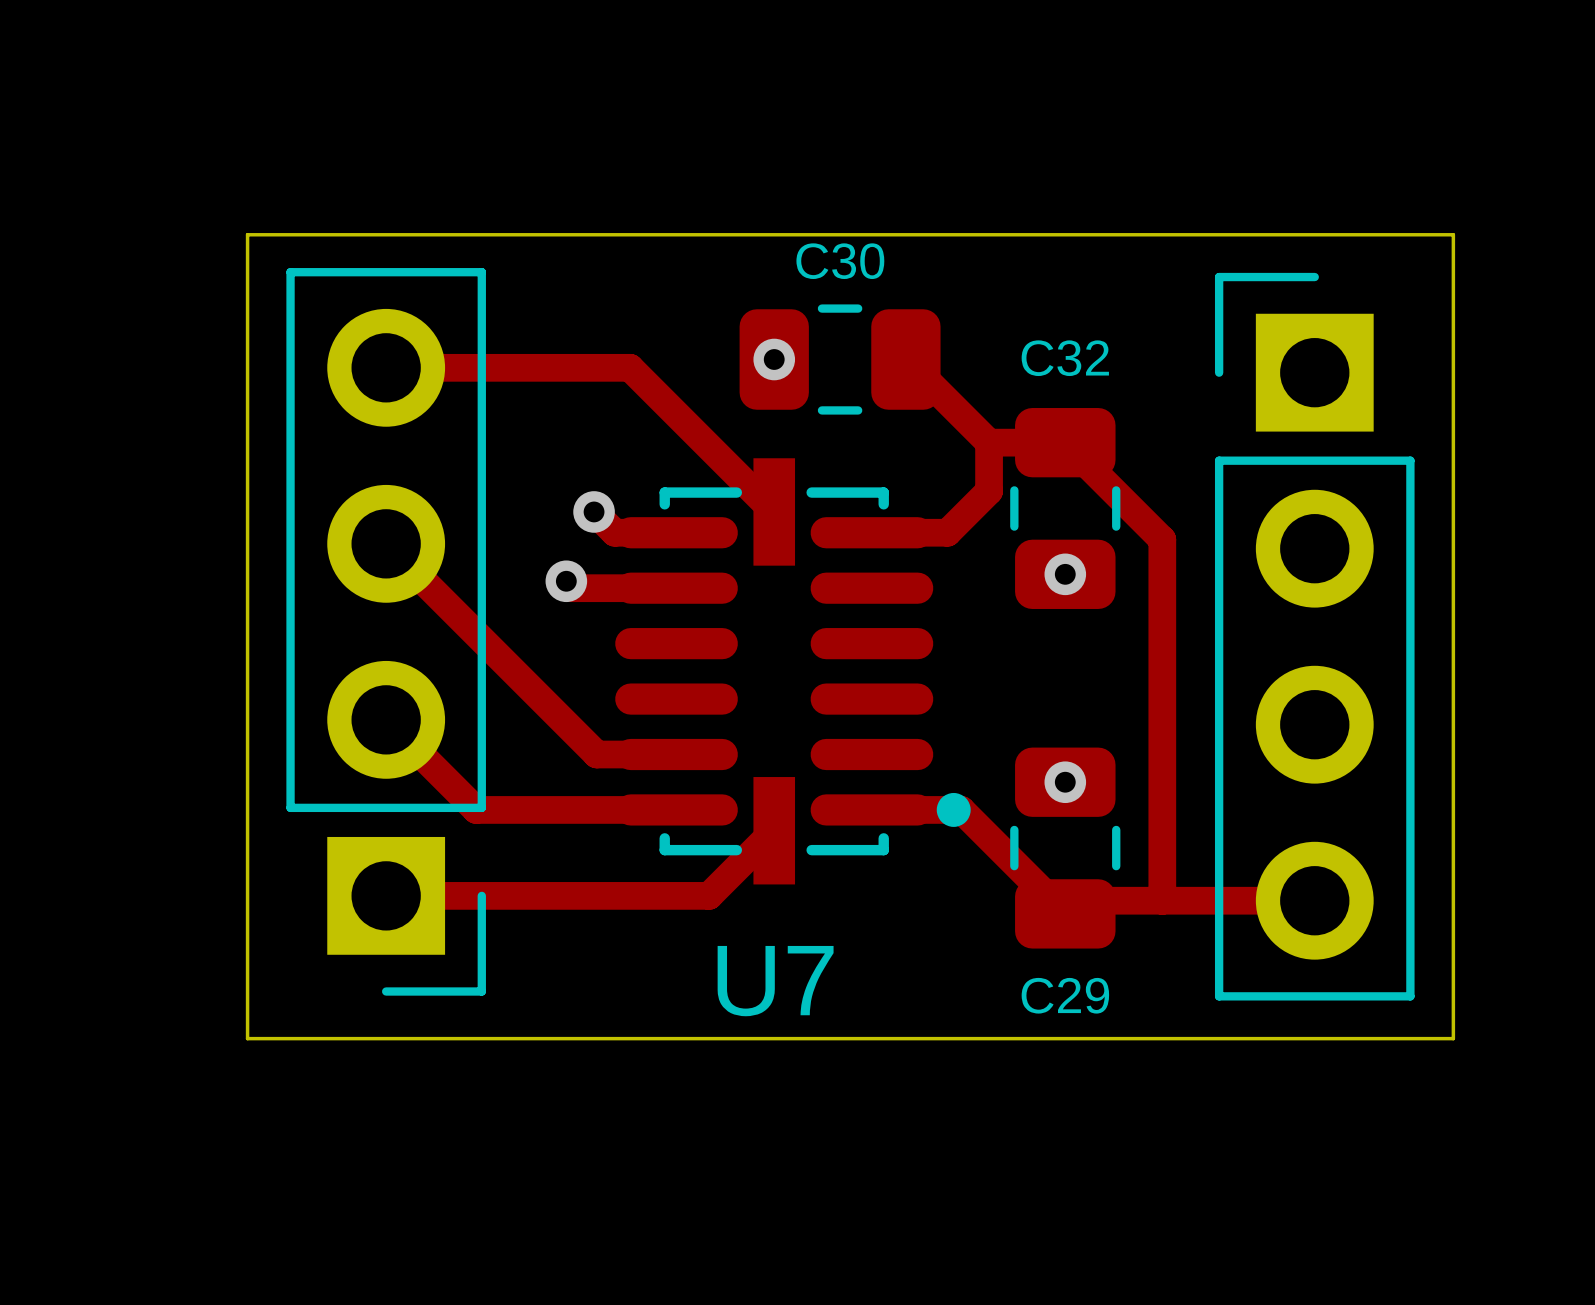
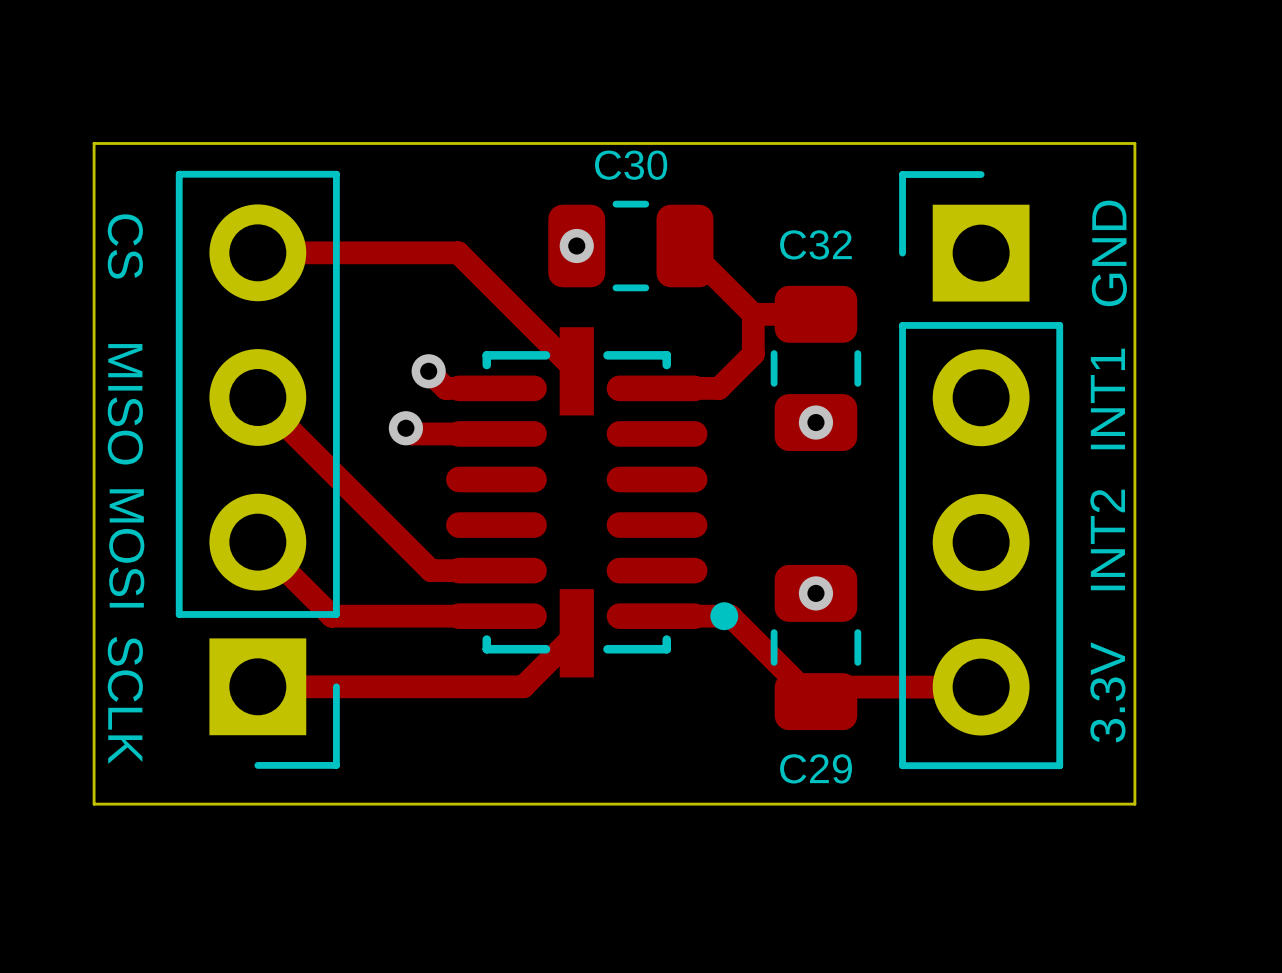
board edge: (247, 234) (247, 1038) -> (143, 143) (94, 143) (94, 804) (143, 804)
text: none -> CS (125, 246)
text: none -> GND (1109, 253)
track: (1065, 442) (1162, 539) (1162, 900) -> none
text: none -> INT1 (1107, 398)
text: none -> MISO (125, 404)
part position: (1314, 636) -> (981, 470)
text: none -> INT2 (1107, 539)
text: none -> MOSI (126, 548)
track: (1078, 900) (1314, 900) -> (826, 690) (830, 687) (981, 687)
text: none -> 3.3V (1107, 692)
text: none -> SCLK (125, 700)
U7 name: U7 (775, 981) -> none

